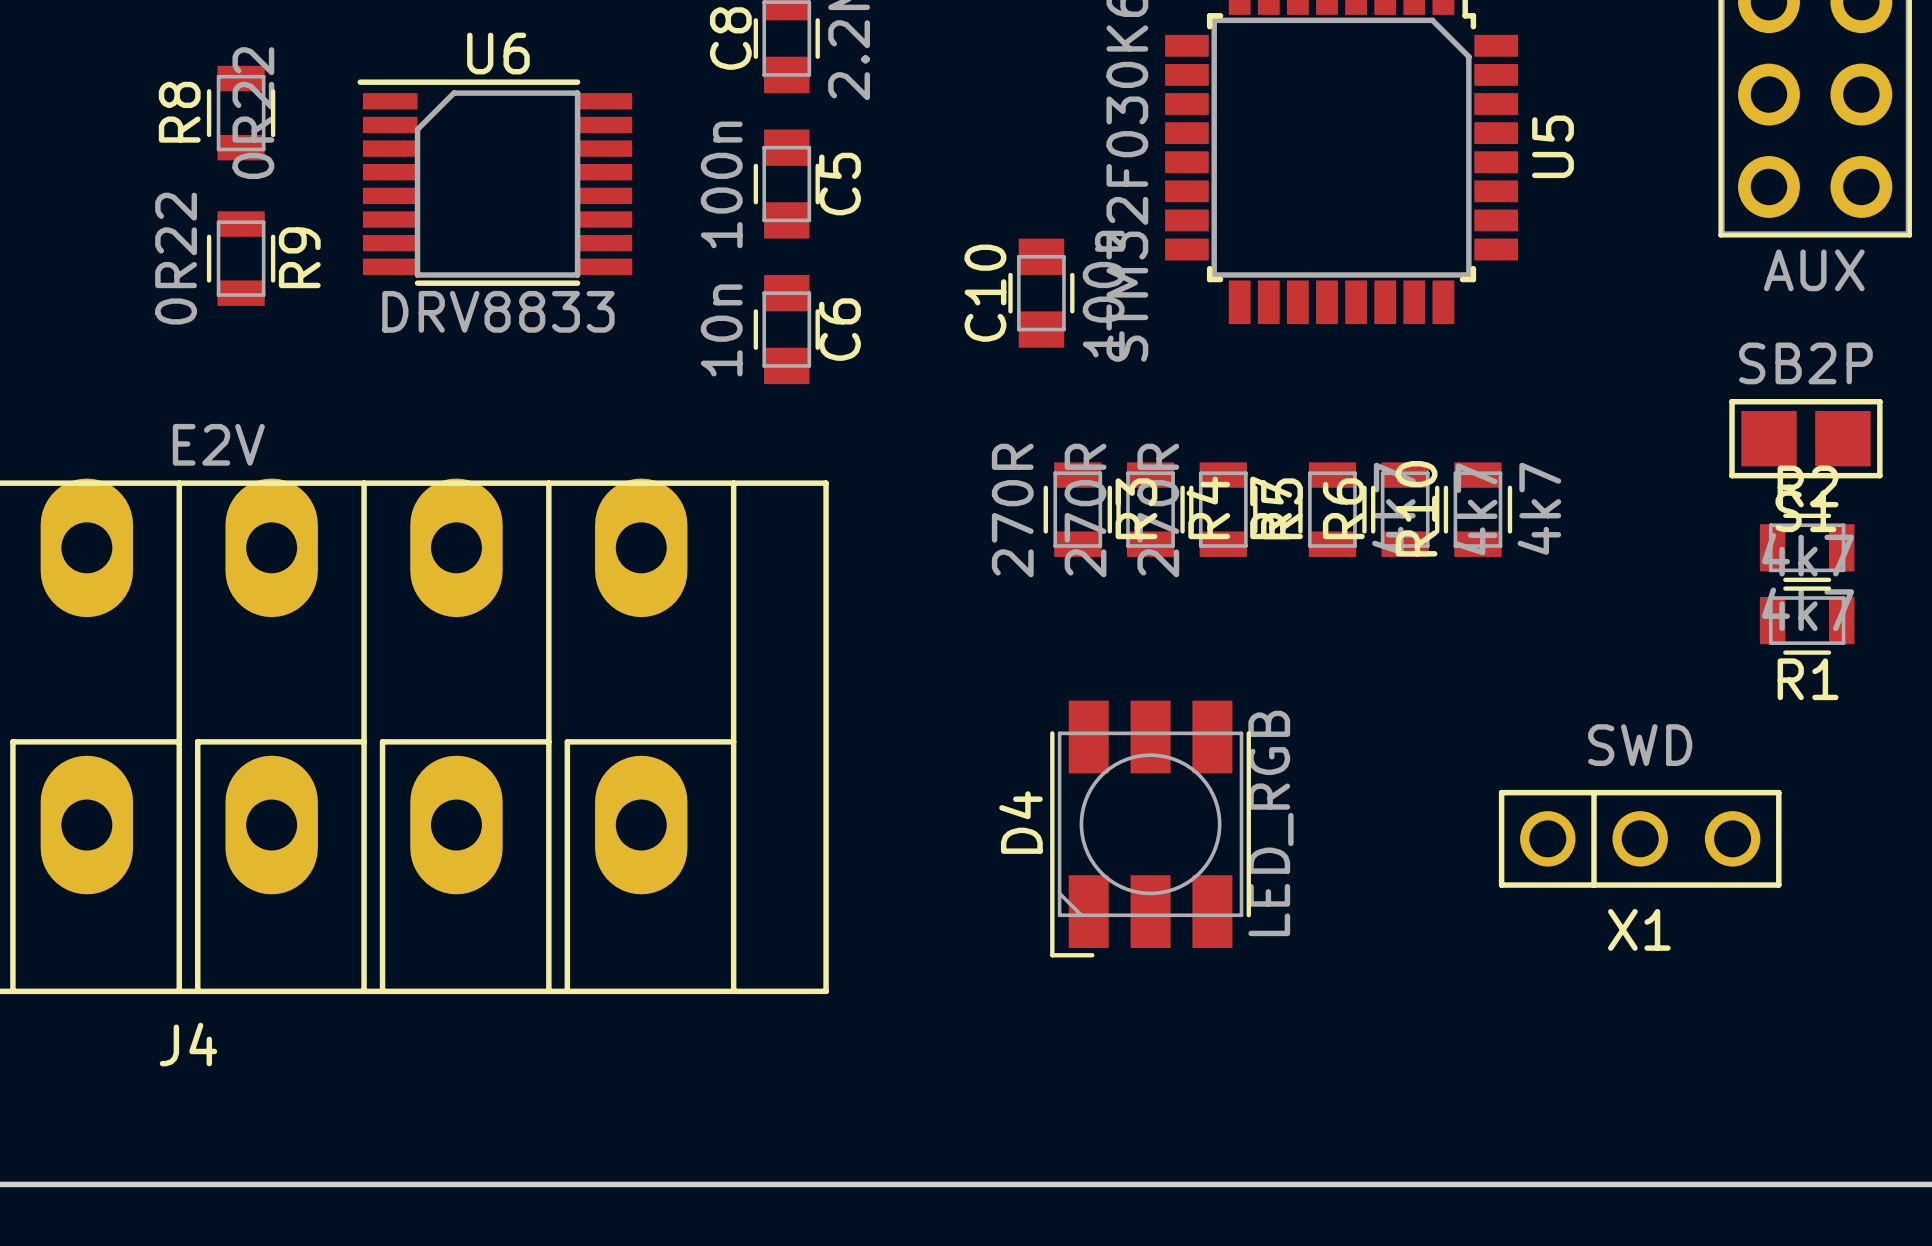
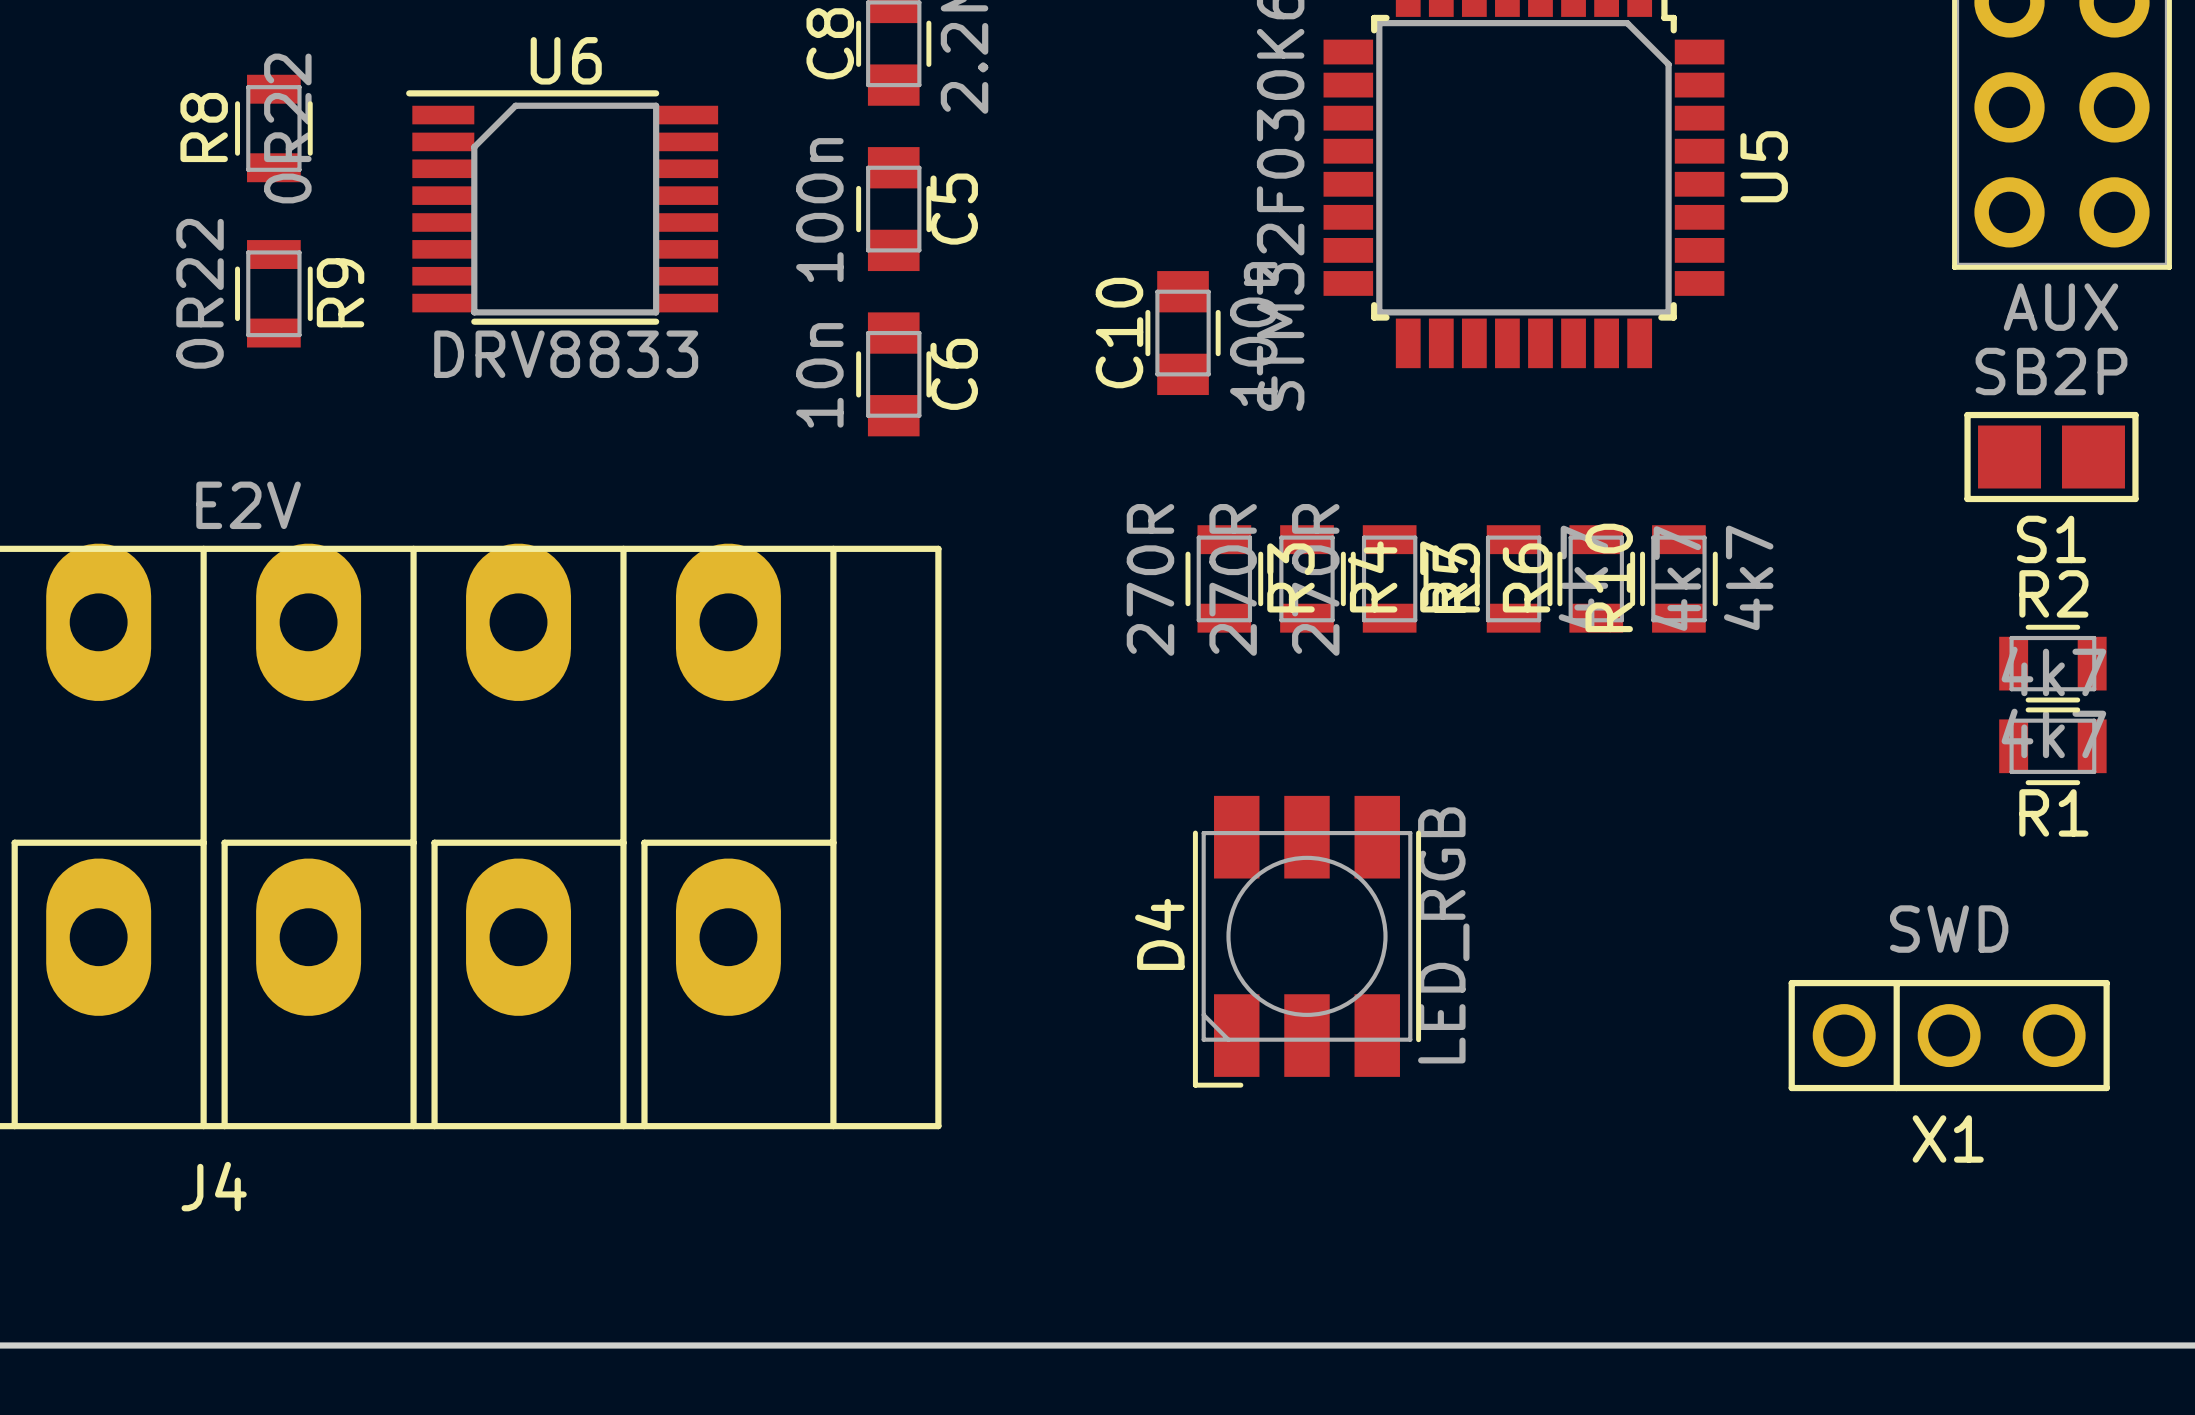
S1 position: (1805, 438) -> (2051, 457)
R2 position: (1807, 547) -> (2052, 663)
R1 position: (1807, 620) -> (2052, 746)
X1 position: (1640, 838) -> (1949, 1035)

